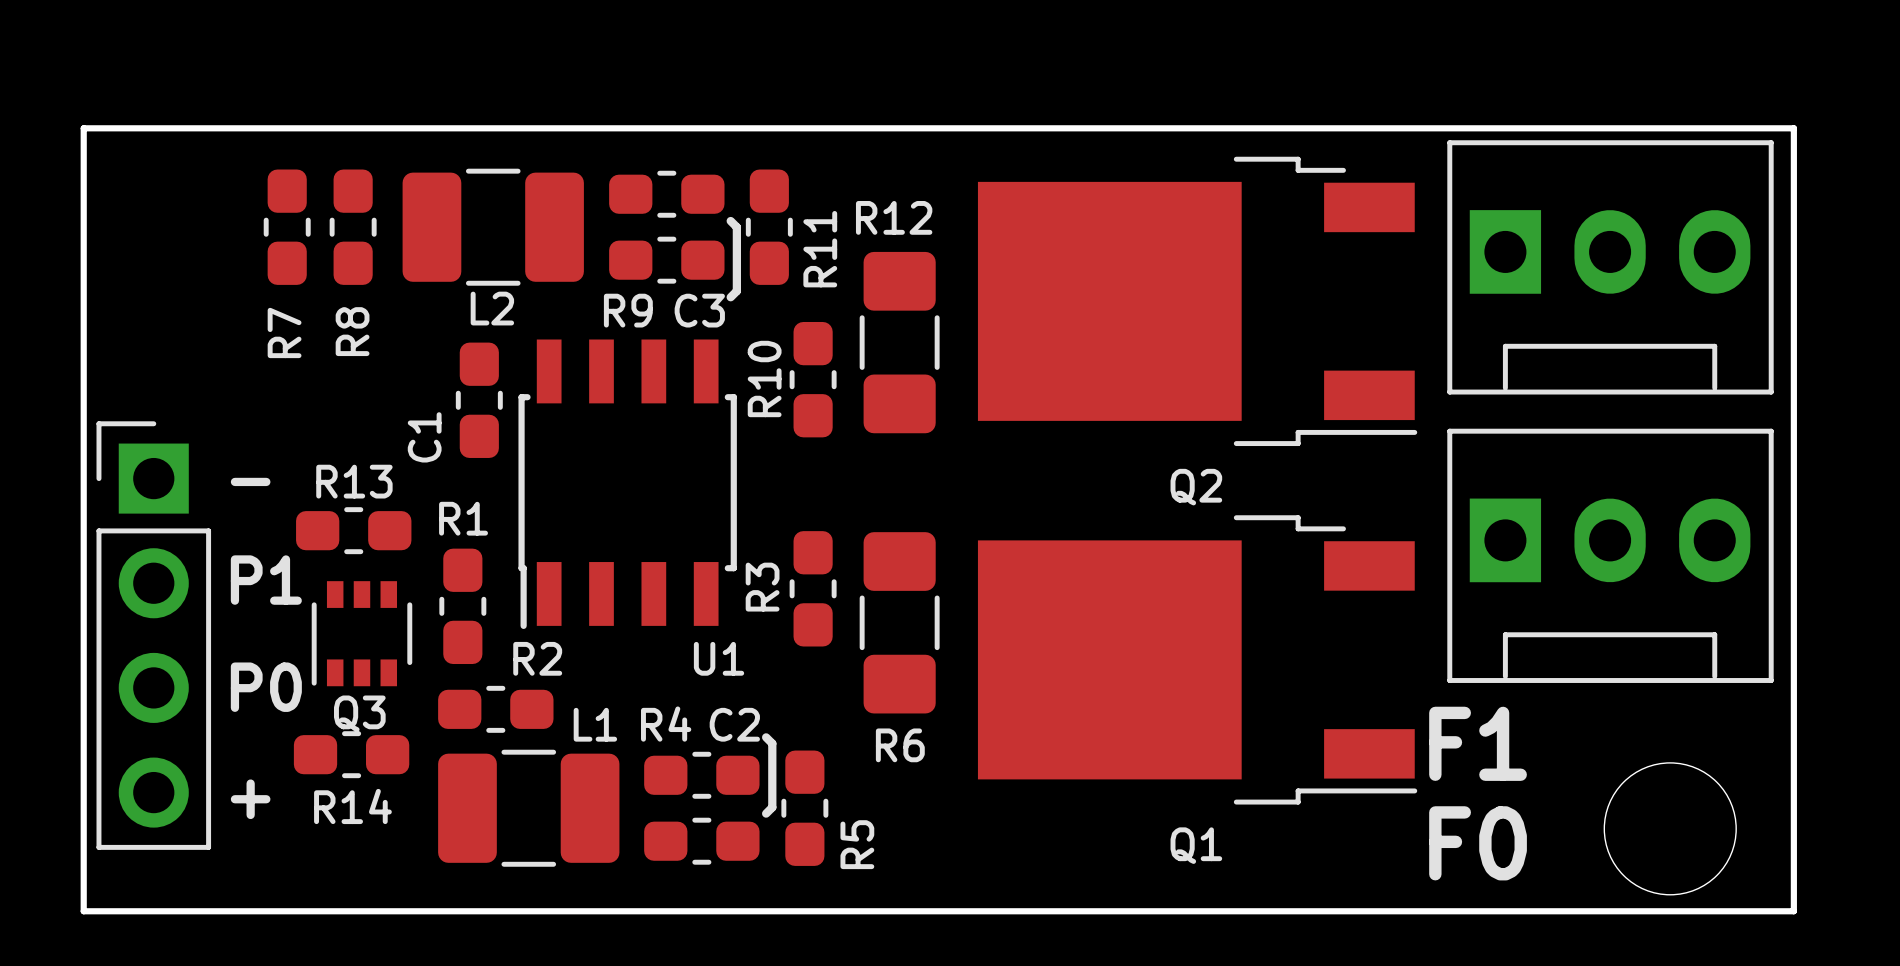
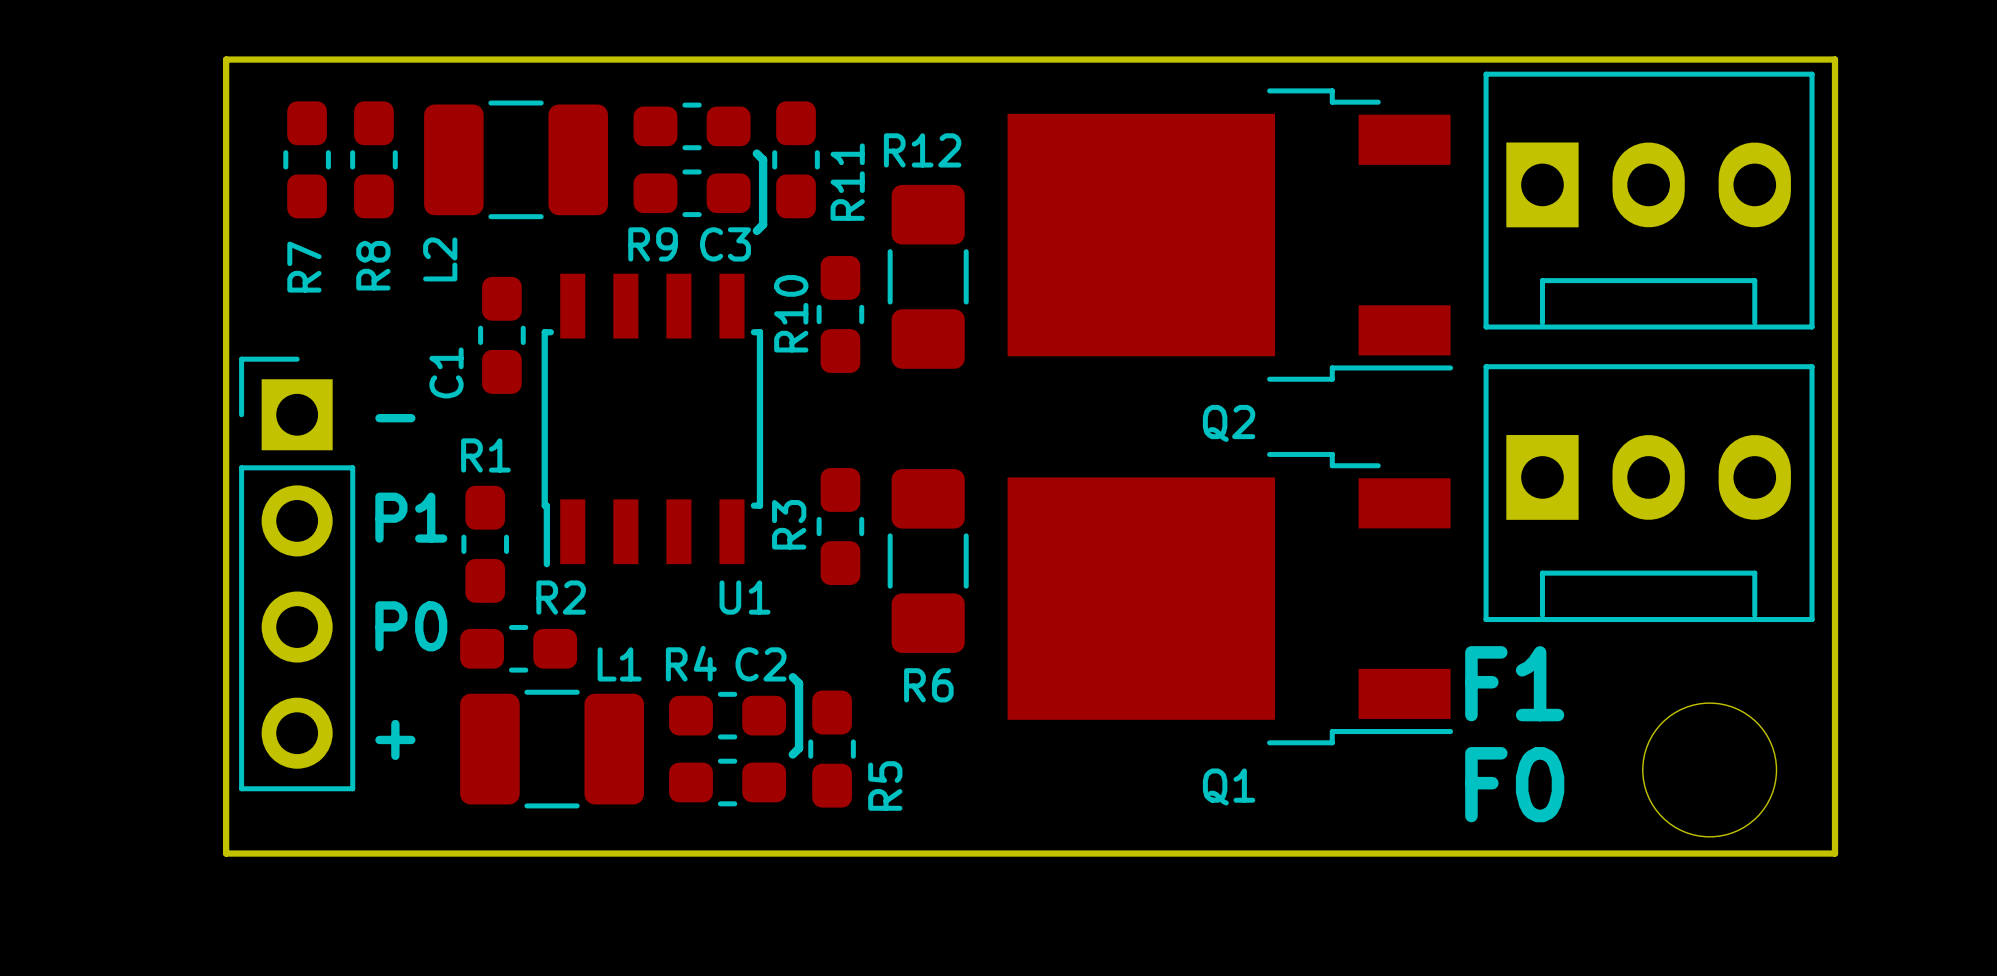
board edge: (207, 128) (83, 128) (83, 911) (207, 911) -> (226, 59) (226, 853)
L2 name rotation: 0° (492, 308) -> 90° counterclockwise (440, 259)
L2 name position: L2 (492, 308) -> L2 (440, 259)
text position: - (250, 481) -> - (395, 418)
R13: (353, 530) -> none
text position: P1 (266, 580) -> P1 (411, 517)
Q3: (361, 633) -> none
part position: (153, 635) -> (297, 573)
text position: P0 (266, 687) -> P0 (411, 626)
R14: (351, 754) -> none
text position: + (250, 799) -> + (395, 739)

